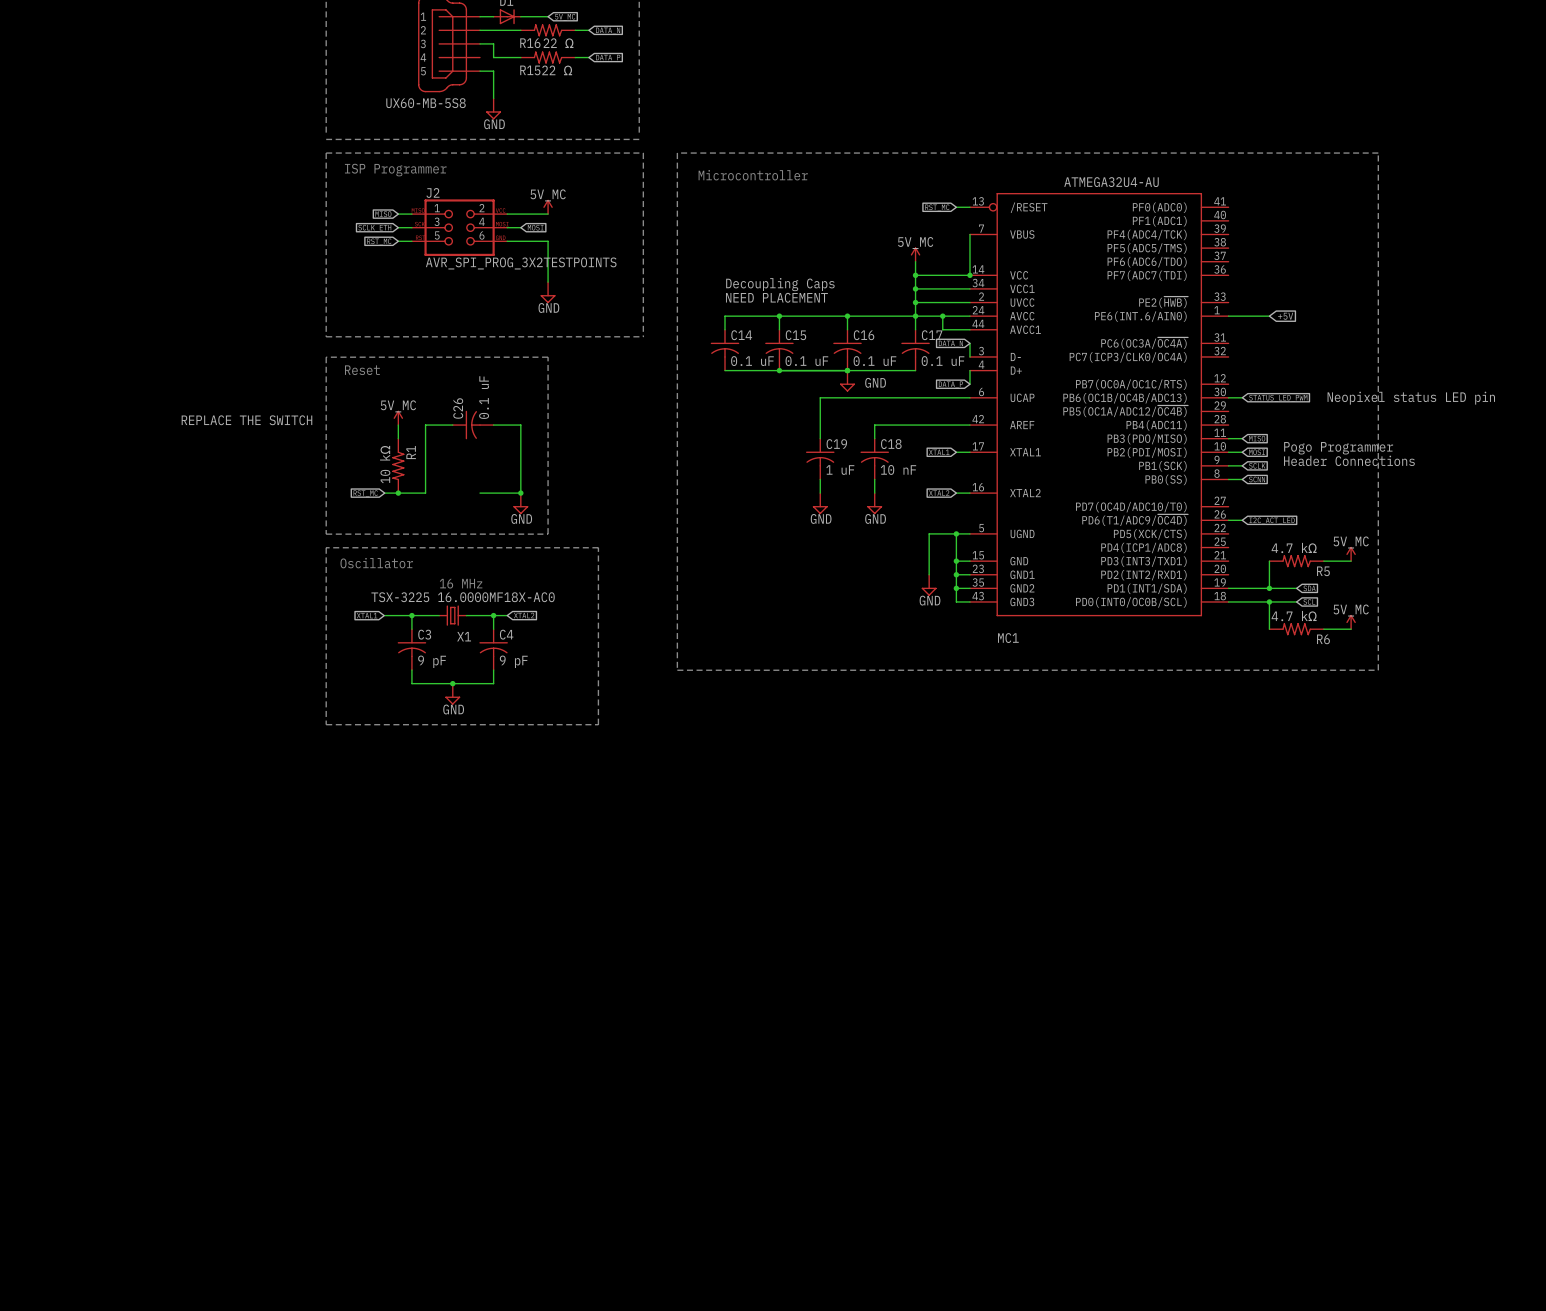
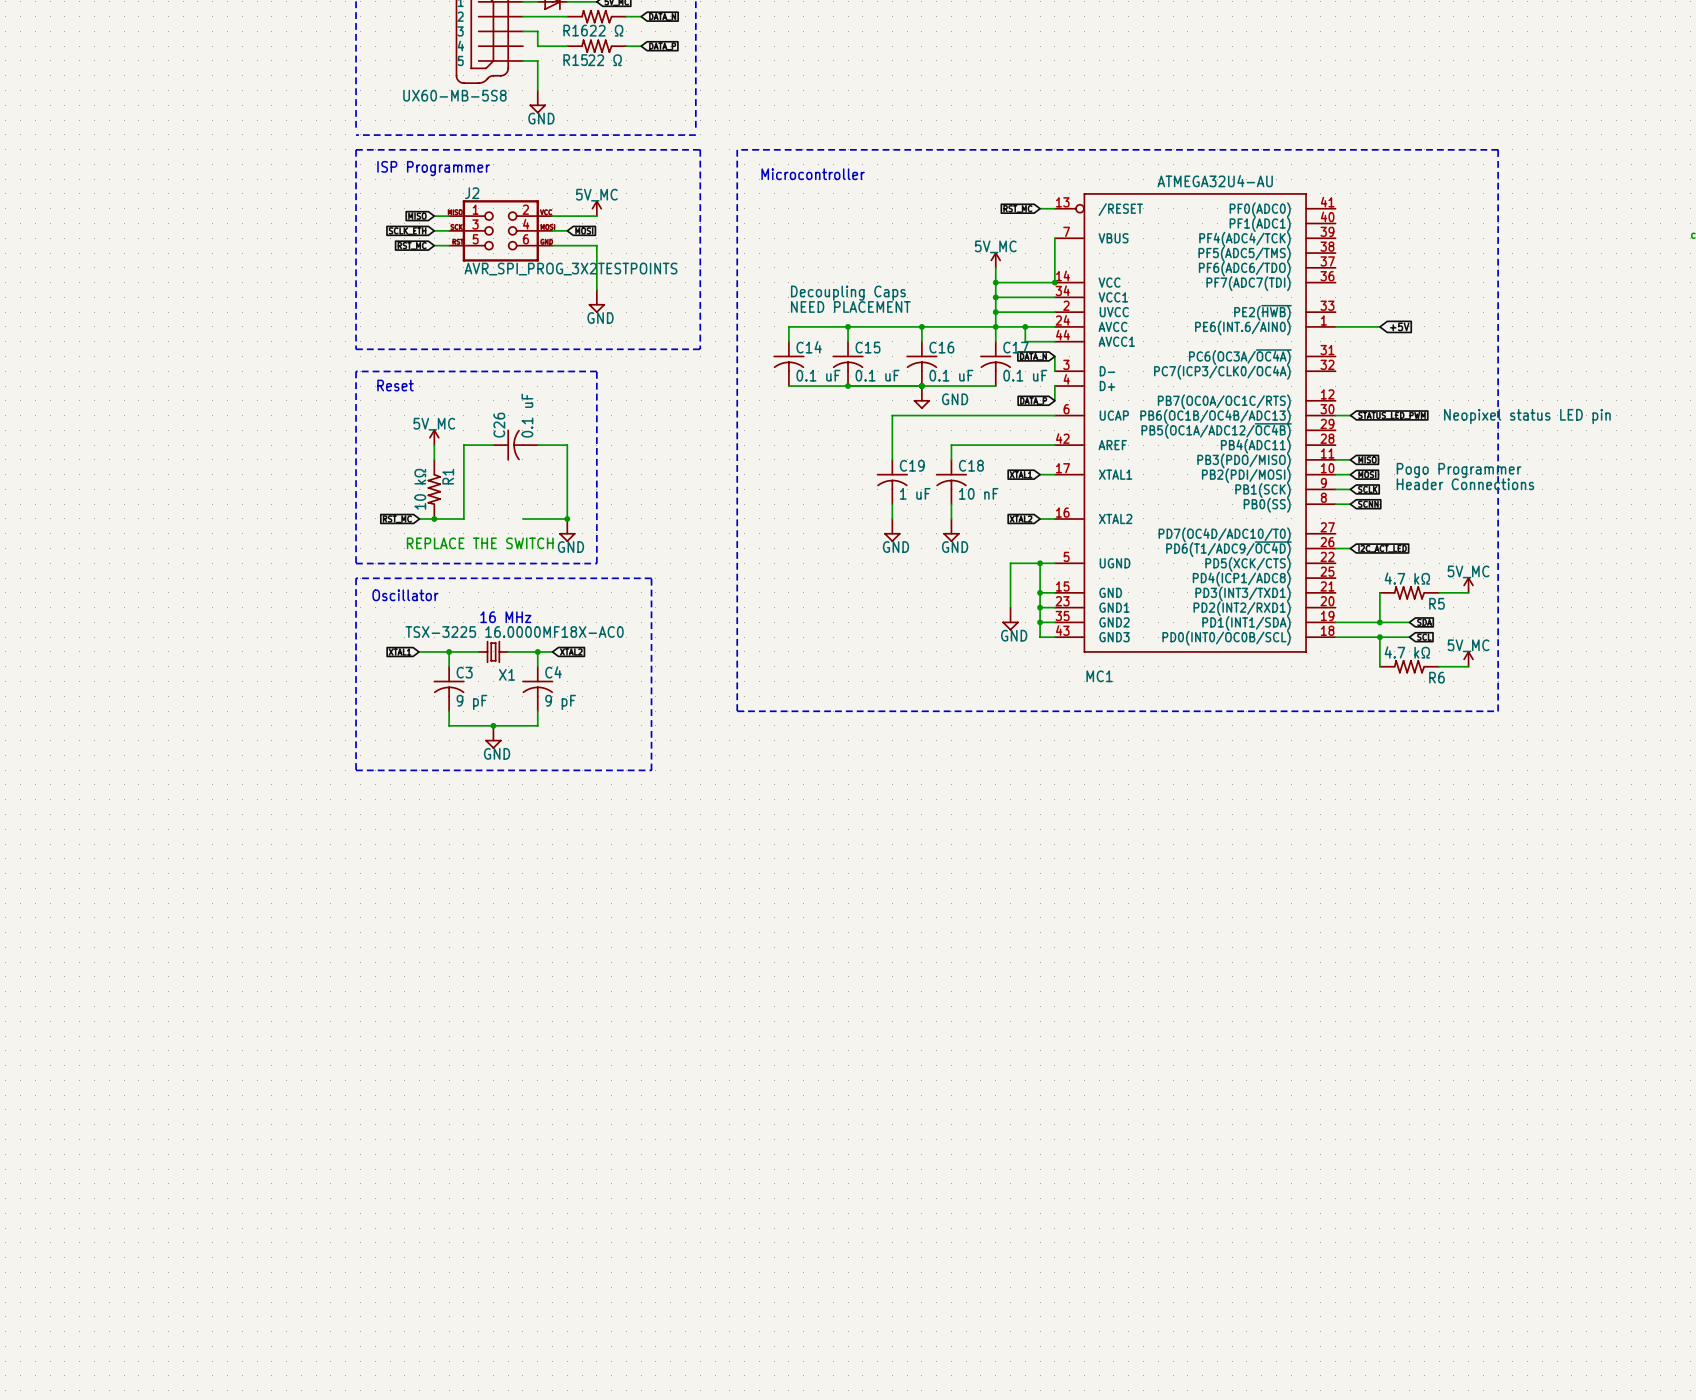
text: REPLACE THE SWITCH (246, 420) -> none
text: none -> REPLACE THE SWITCH (480, 543)

